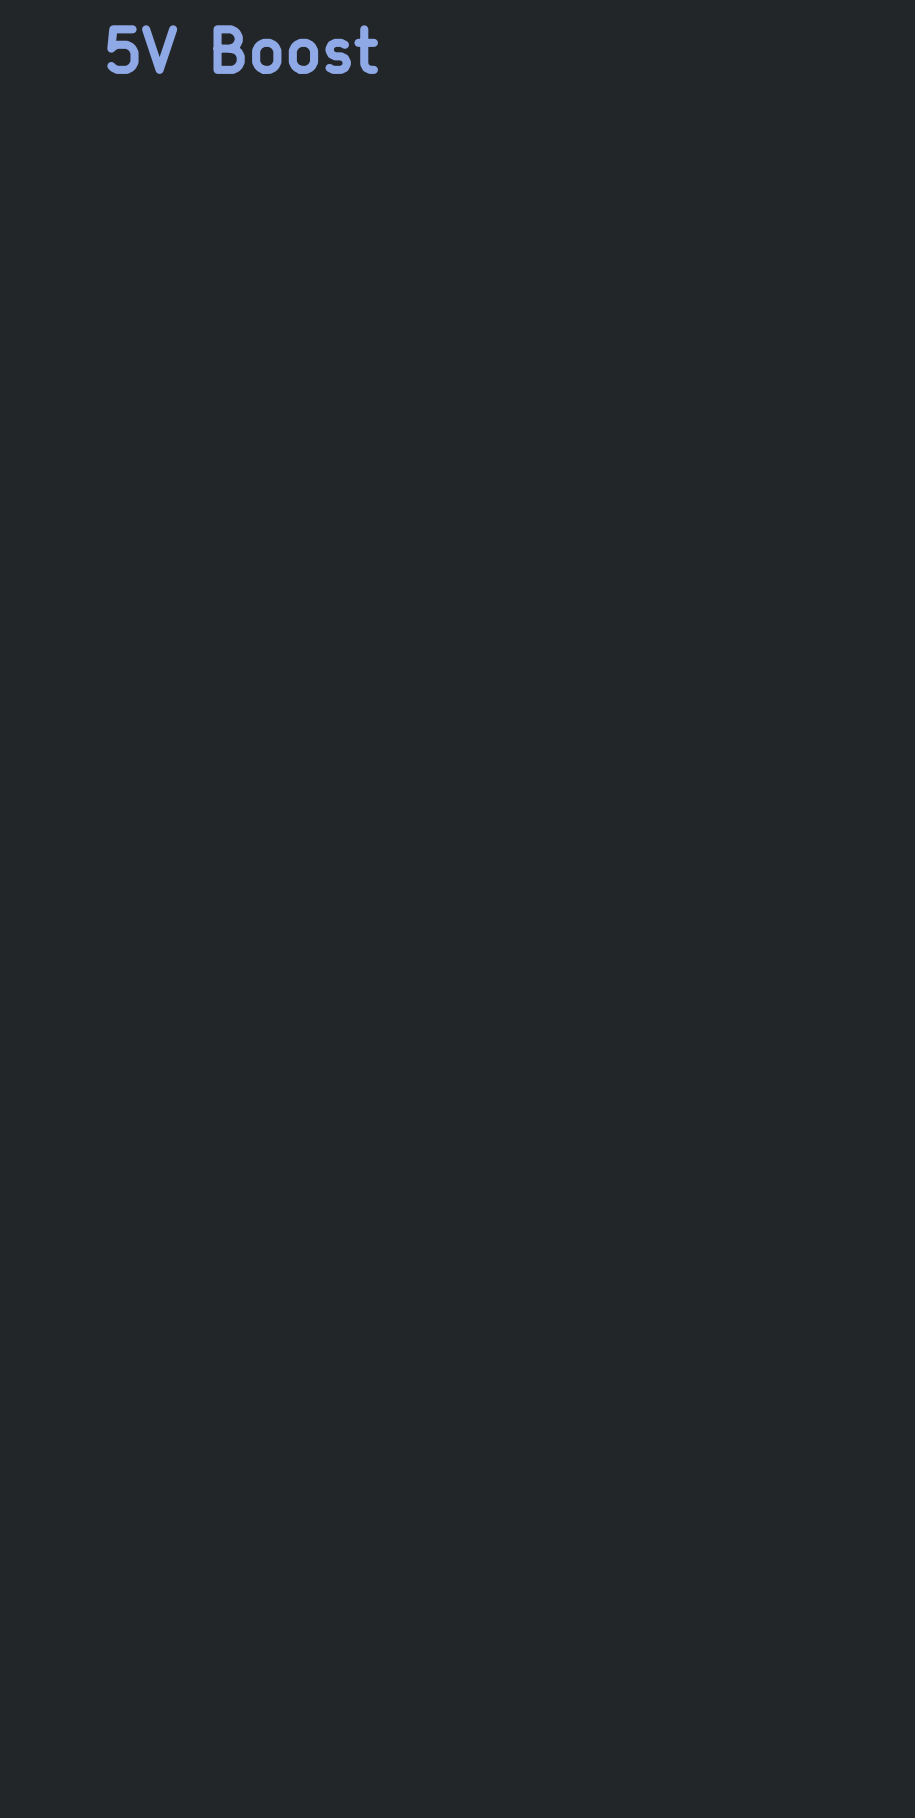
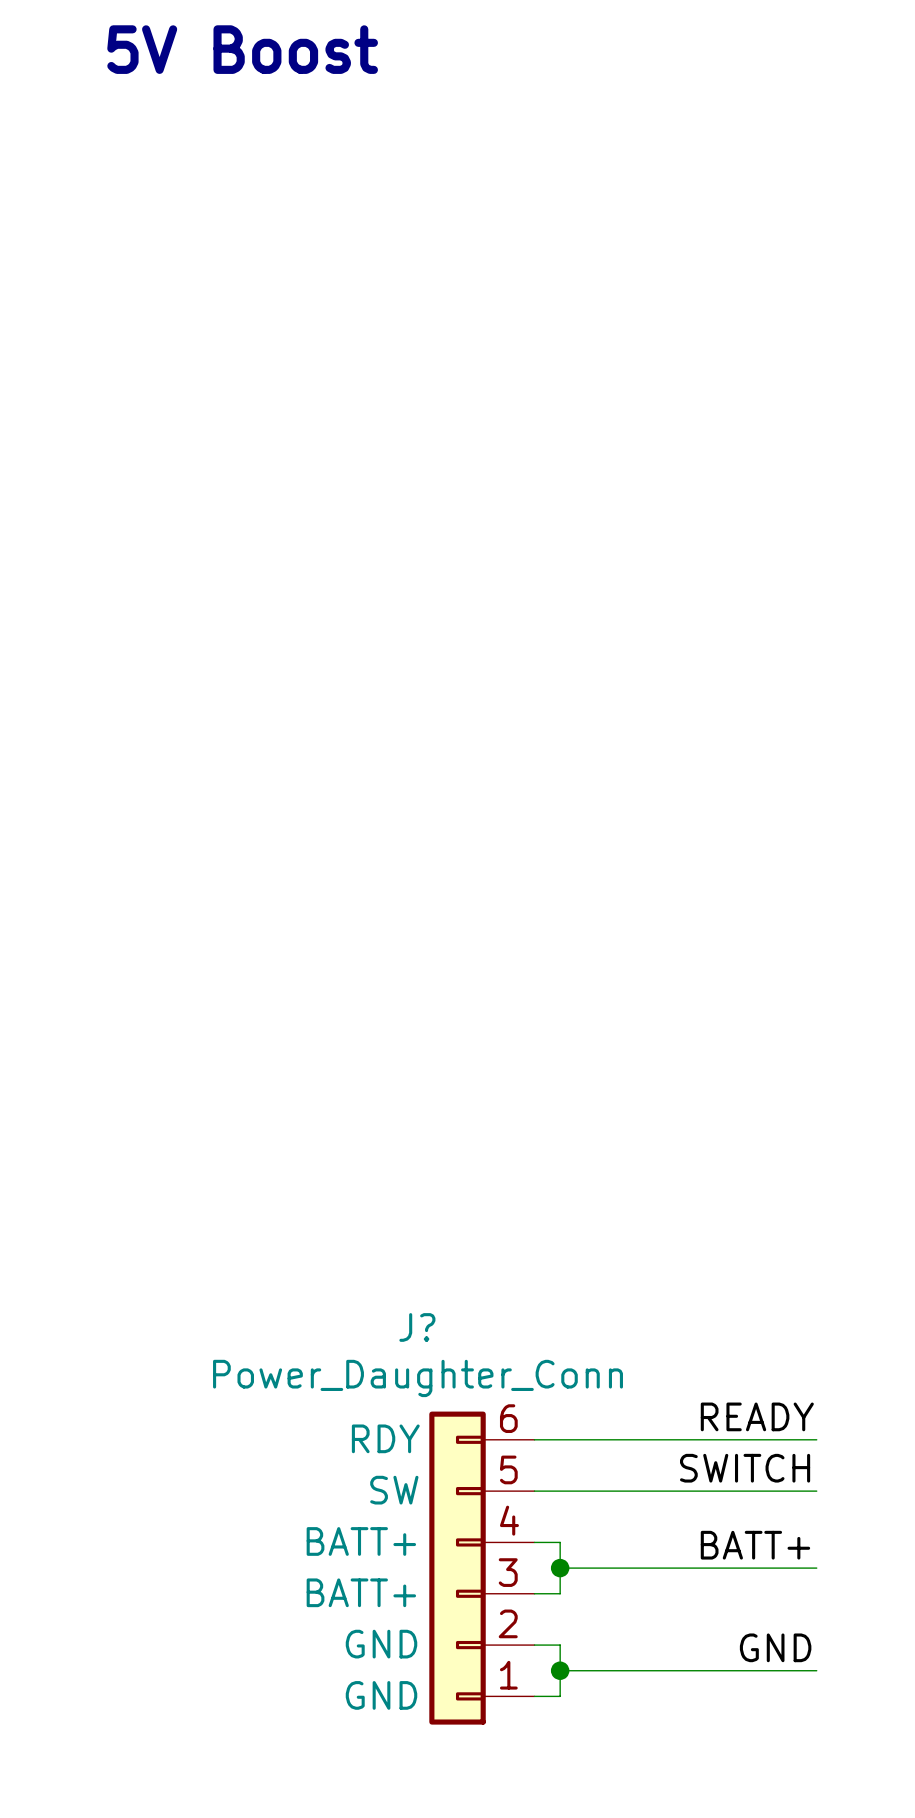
label: none -> READY (757, 1416)
wire: none -> (534, 1439) (816, 1439)
label: none -> SWITCH (745, 1468)
wire: none -> (534, 1491) (816, 1491)
wire: none -> (534, 1542) (560, 1542) (560, 1593) (534, 1593)
label: none -> BATT+ (755, 1545)
J?: none -> Power_Daughter_Conn (481, 1568)
wire: none -> (560, 1568) (816, 1568)
junction: none -> (560, 1568)
wire: none -> (534, 1645) (560, 1645) (560, 1696) (534, 1696)
label: none -> GND (775, 1647)
wire: none -> (560, 1670) (816, 1670)
junction: none -> (560, 1670)

